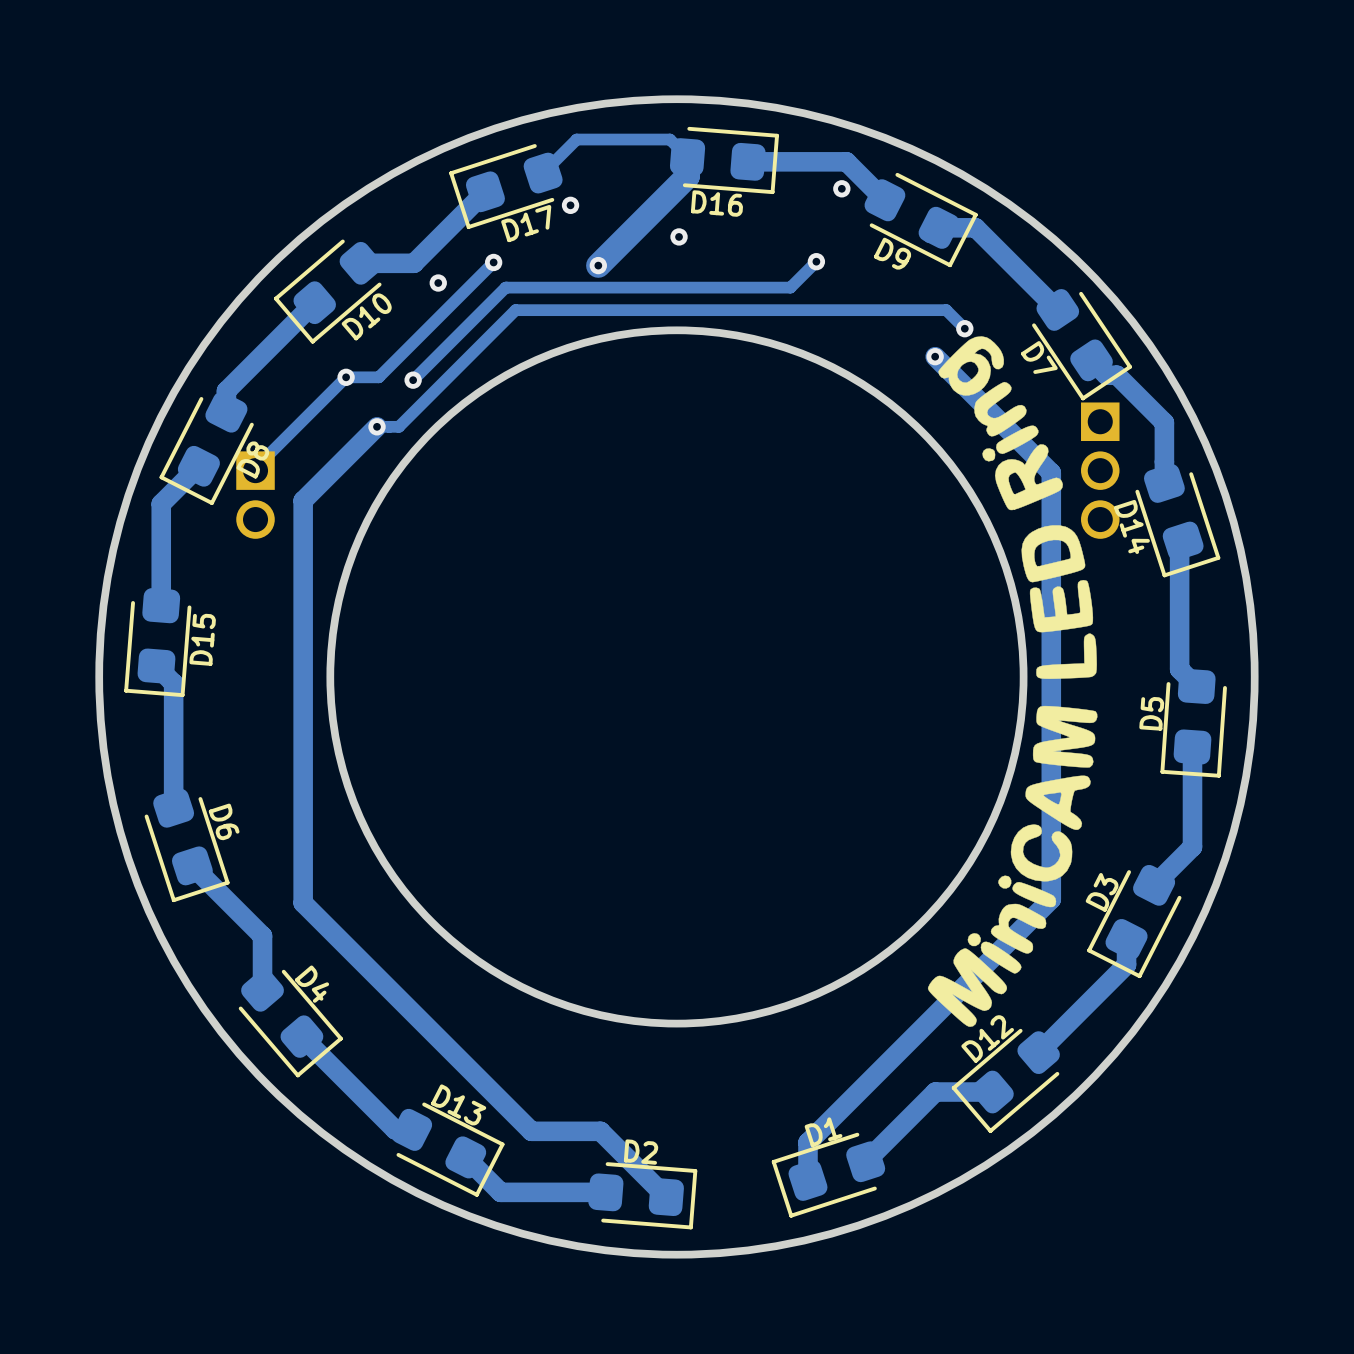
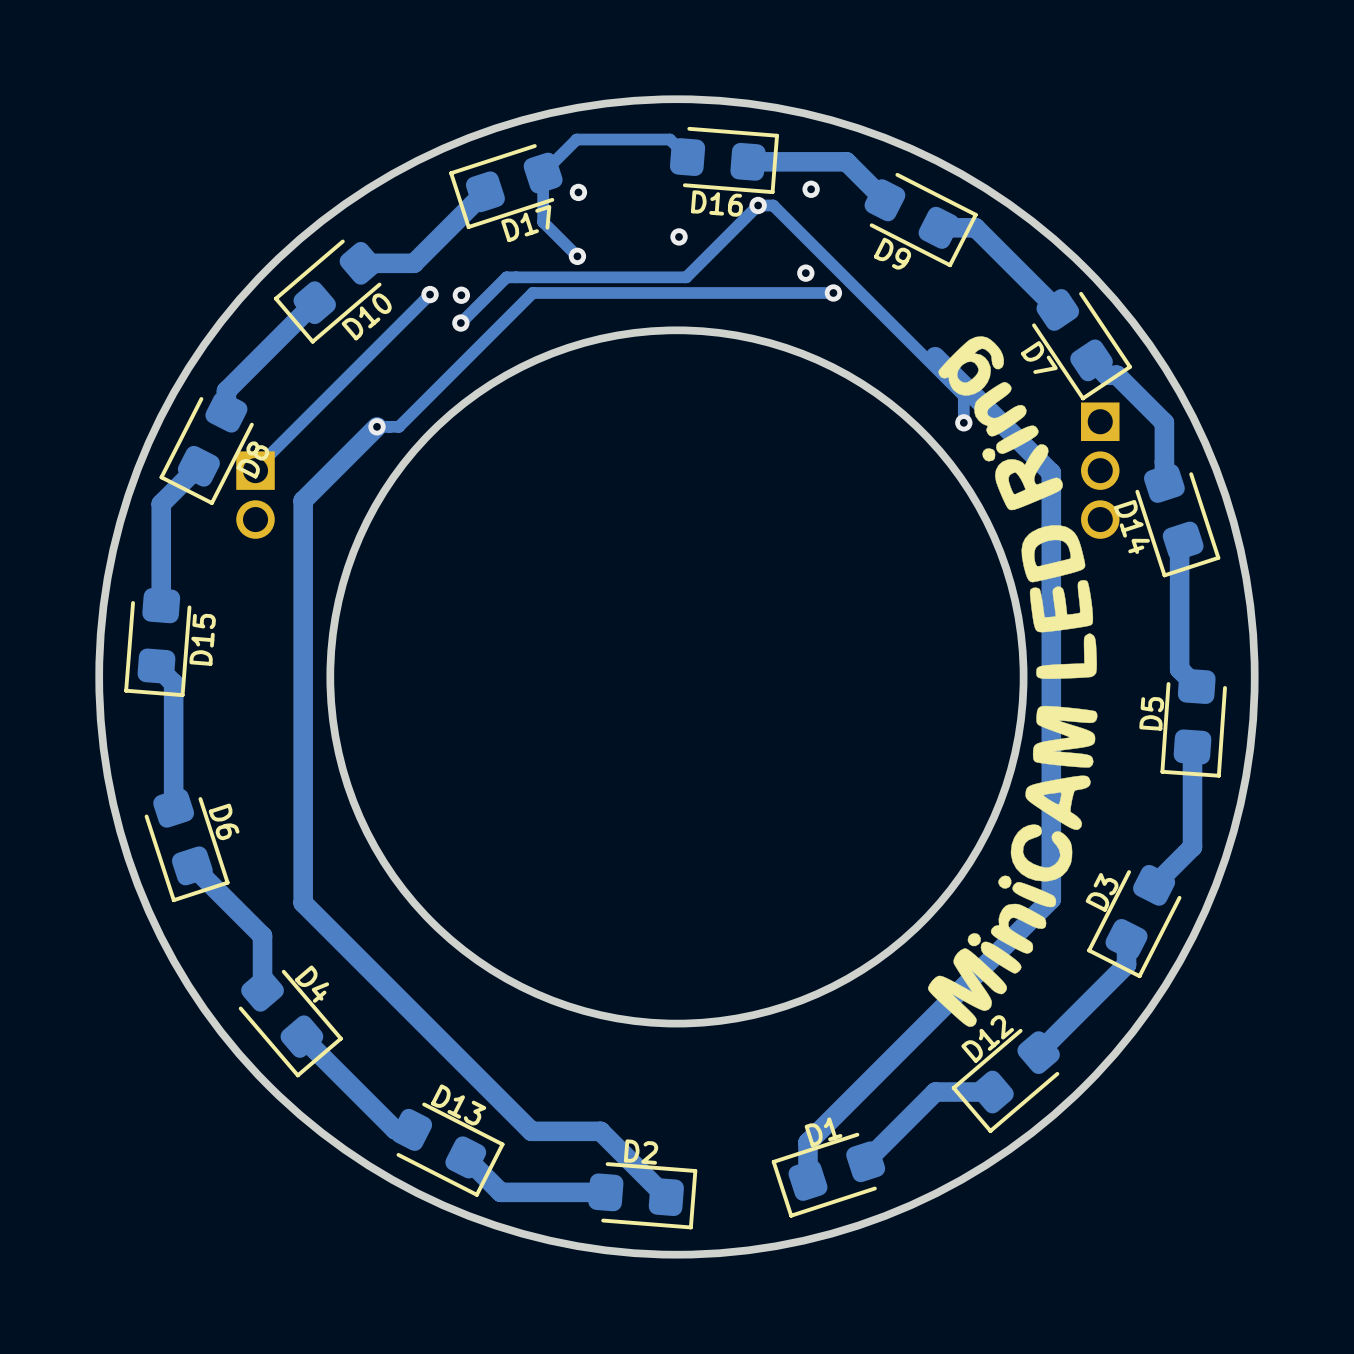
track: (687, 157) (687, 176) (598, 265) -> none
track: none -> (543, 173) (543, 222) (577, 256)
via position: (841, 188) -> (811, 189)
via position: (570, 205) -> (578, 192)
via: none -> (758, 205)
track: (816, 261) (790, 287) (505, 287) (413, 380) -> none
via position: (816, 261) -> (805, 273)
track: (493, 262) (378, 377) (346, 377) (255, 467) -> (430, 294) (255, 469)
via: (493, 262) -> none
via position: (598, 265) -> (577, 256)
via position: (438, 283) -> (430, 294)
via: none -> (833, 292)
via: none -> (461, 295)
track: (515, 310) (946, 310) (964, 328) -> (515, 310) (532, 292) (833, 292)
track: none -> (460, 323) (506, 277) (686, 277) (758, 205) (773, 205) (963, 396) (963, 422)
via: none -> (460, 323)
via: (964, 328) -> none
via: (935, 356) -> none
via: (346, 377) -> none
via: (413, 380) -> none
via: none -> (963, 422)

